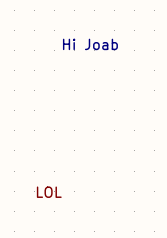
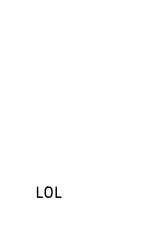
text: Hi Joab (90, 44) -> none

